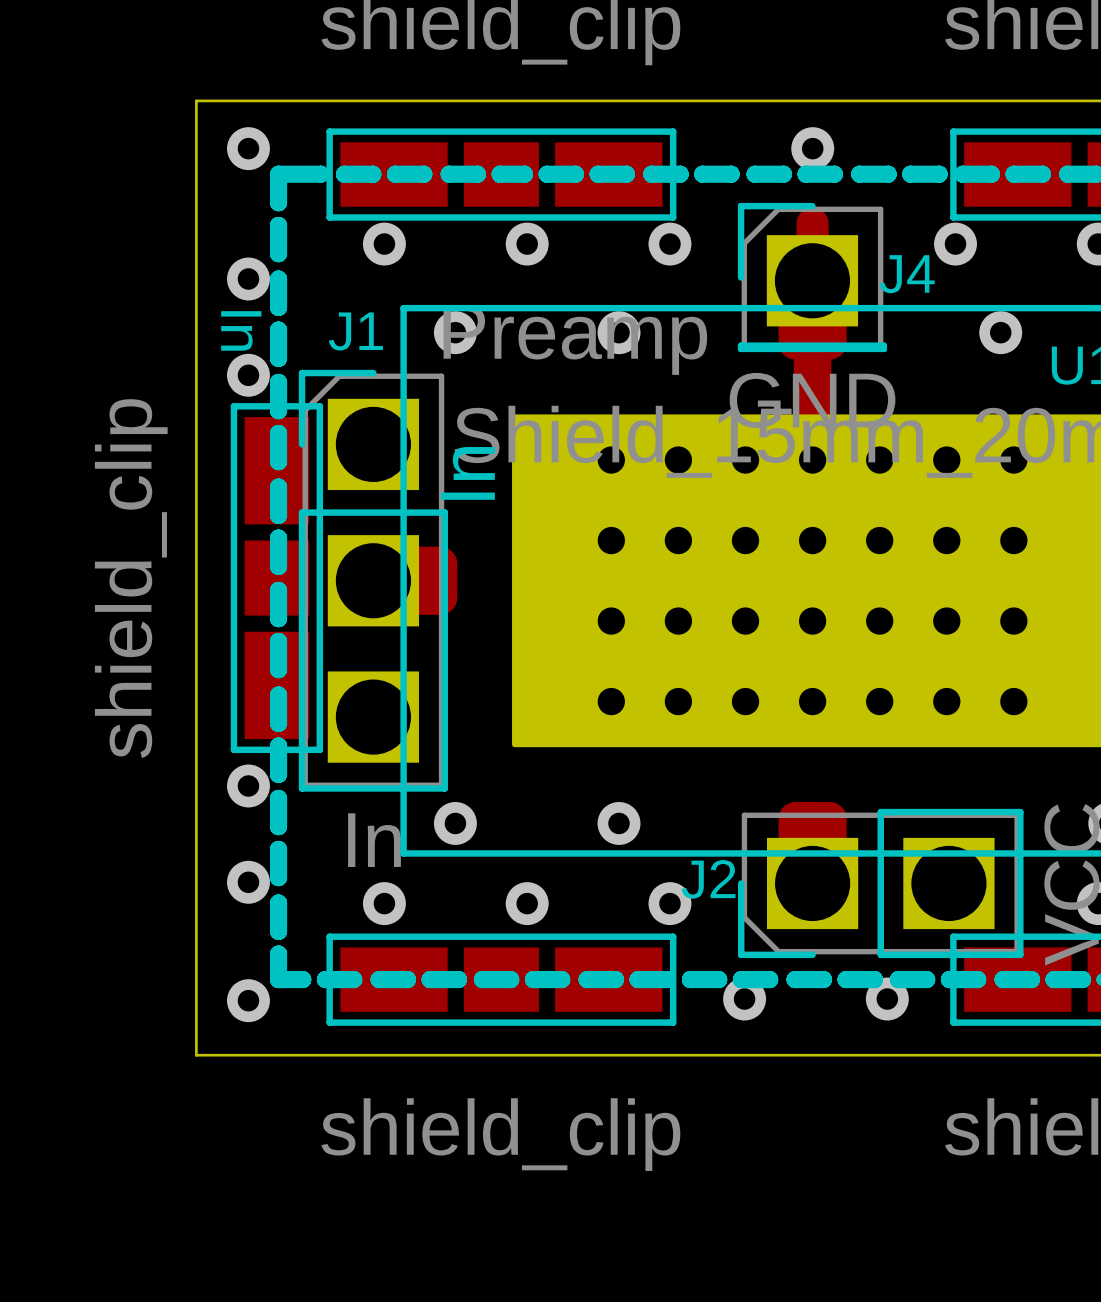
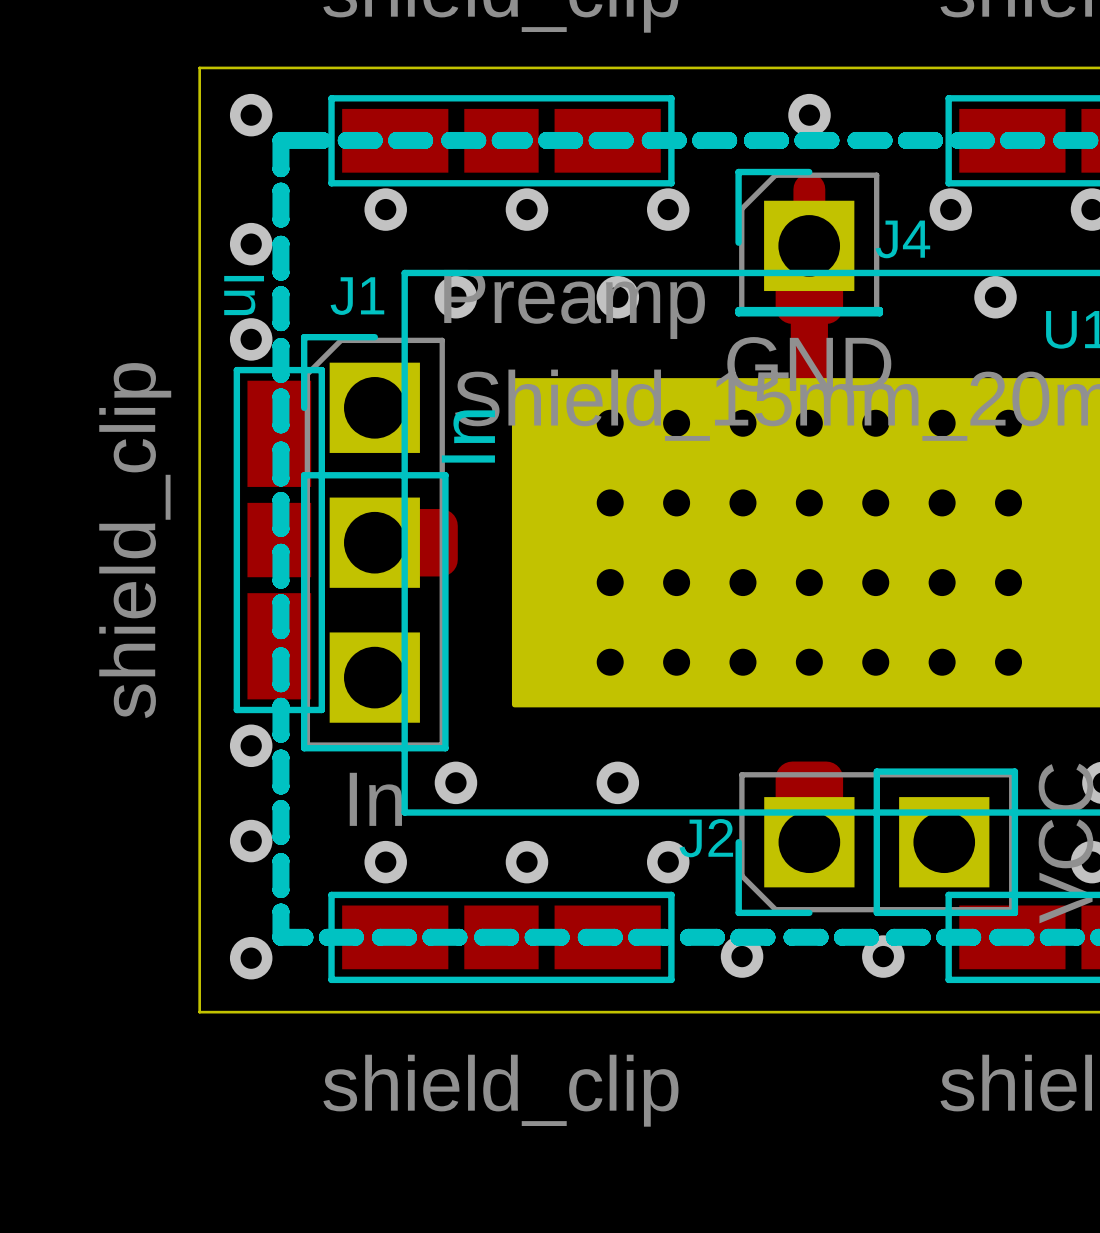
J4 footprint: [737, 202, 888, 353] -> [735, 168, 884, 317]
J1 footprint: [298, 369, 449, 792] -> [300, 334, 449, 752]
J2 footprint: [737, 808, 1024, 959] -> [735, 768, 1019, 917]

